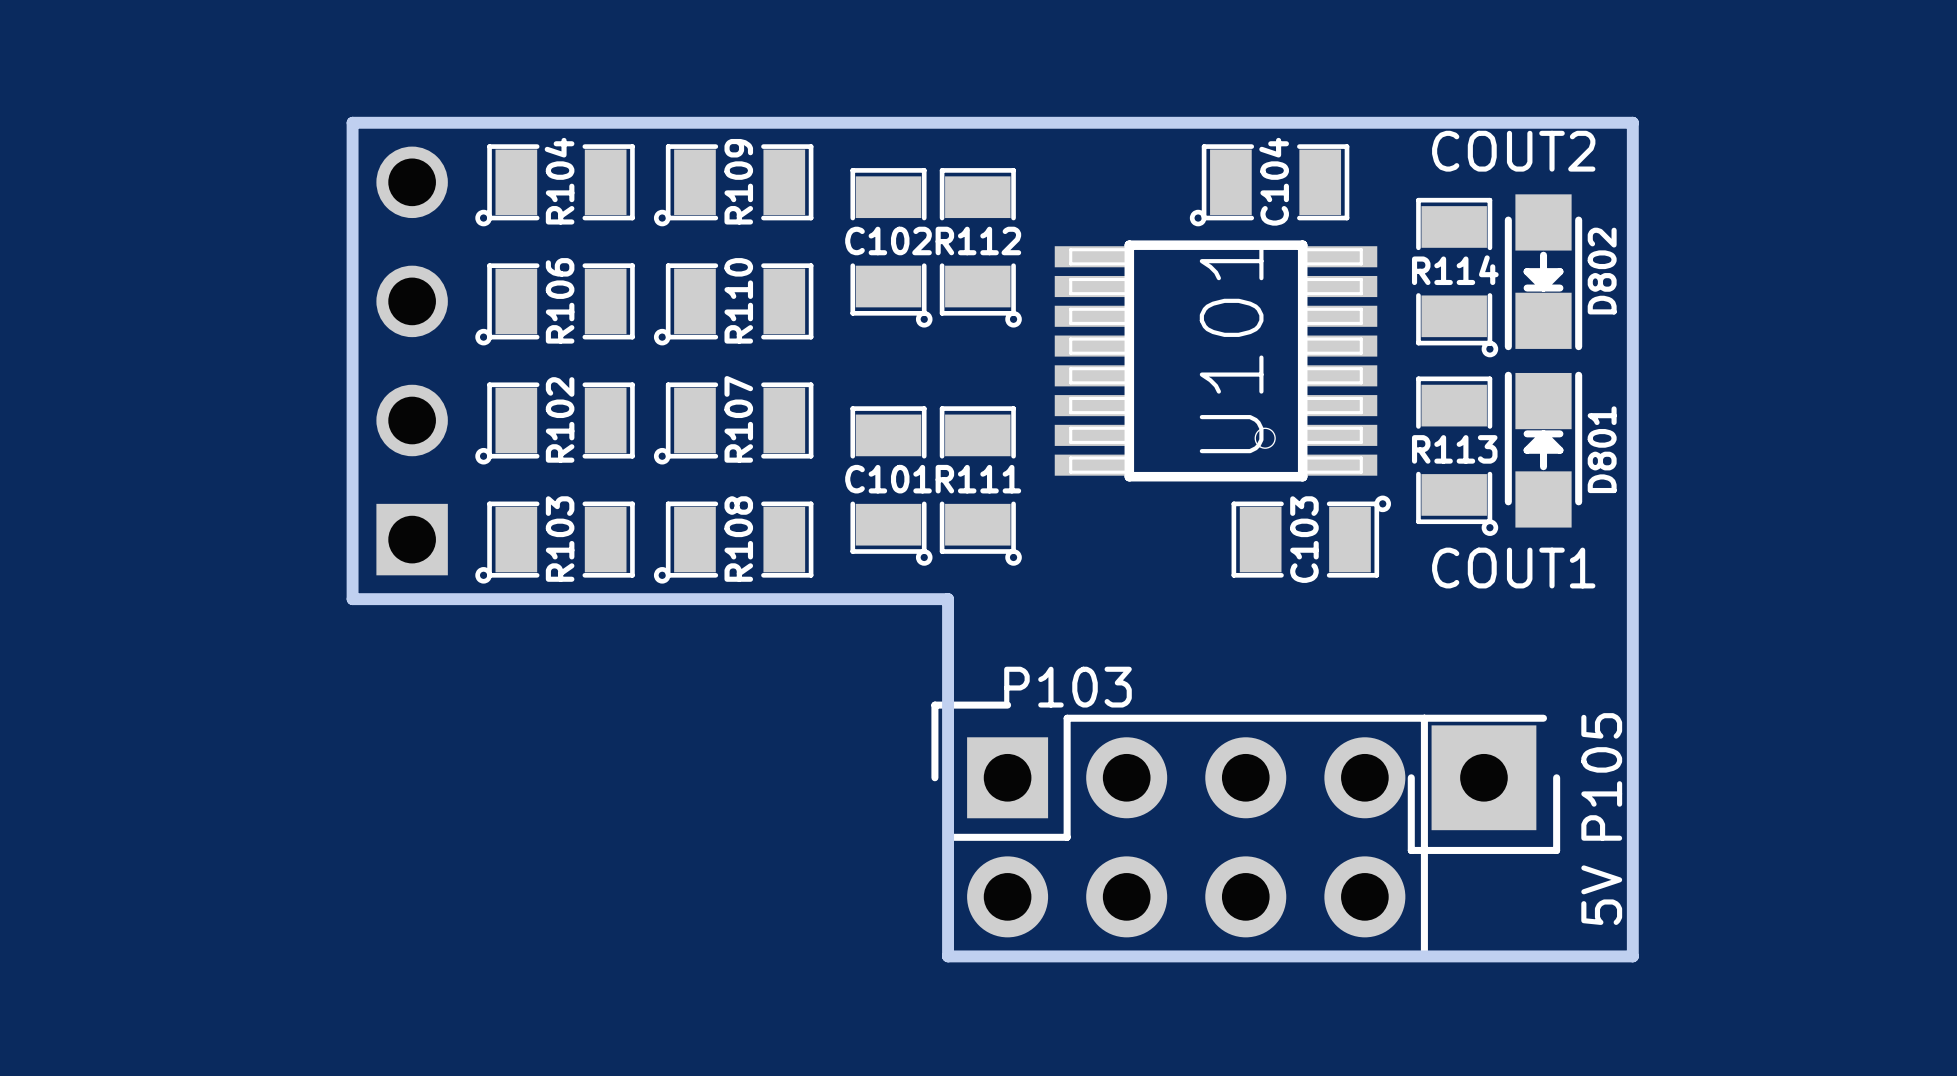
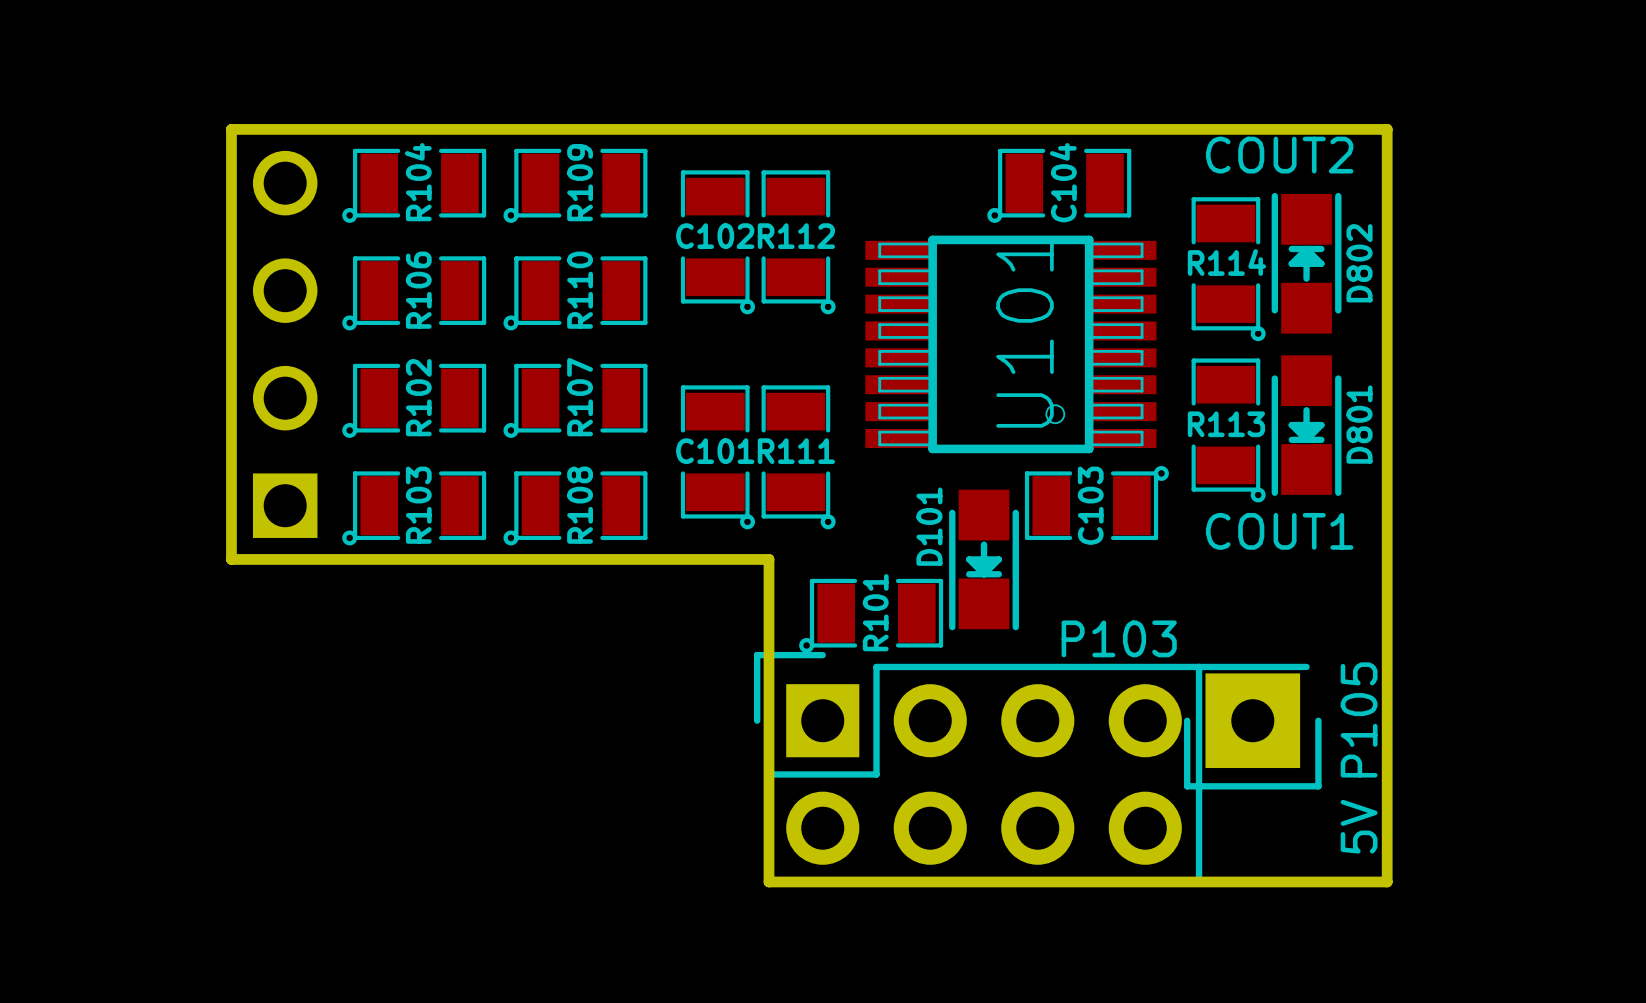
D802 rotation: 0° (1543, 272) -> 180° (1306, 263)
D801 rotation: 0° (1543, 449) -> 180° (1306, 425)
D101: none -> (984, 560)
R101: none -> (871, 615)
P103 name position: P103 (1067, 687) -> P103 (1119, 638)

